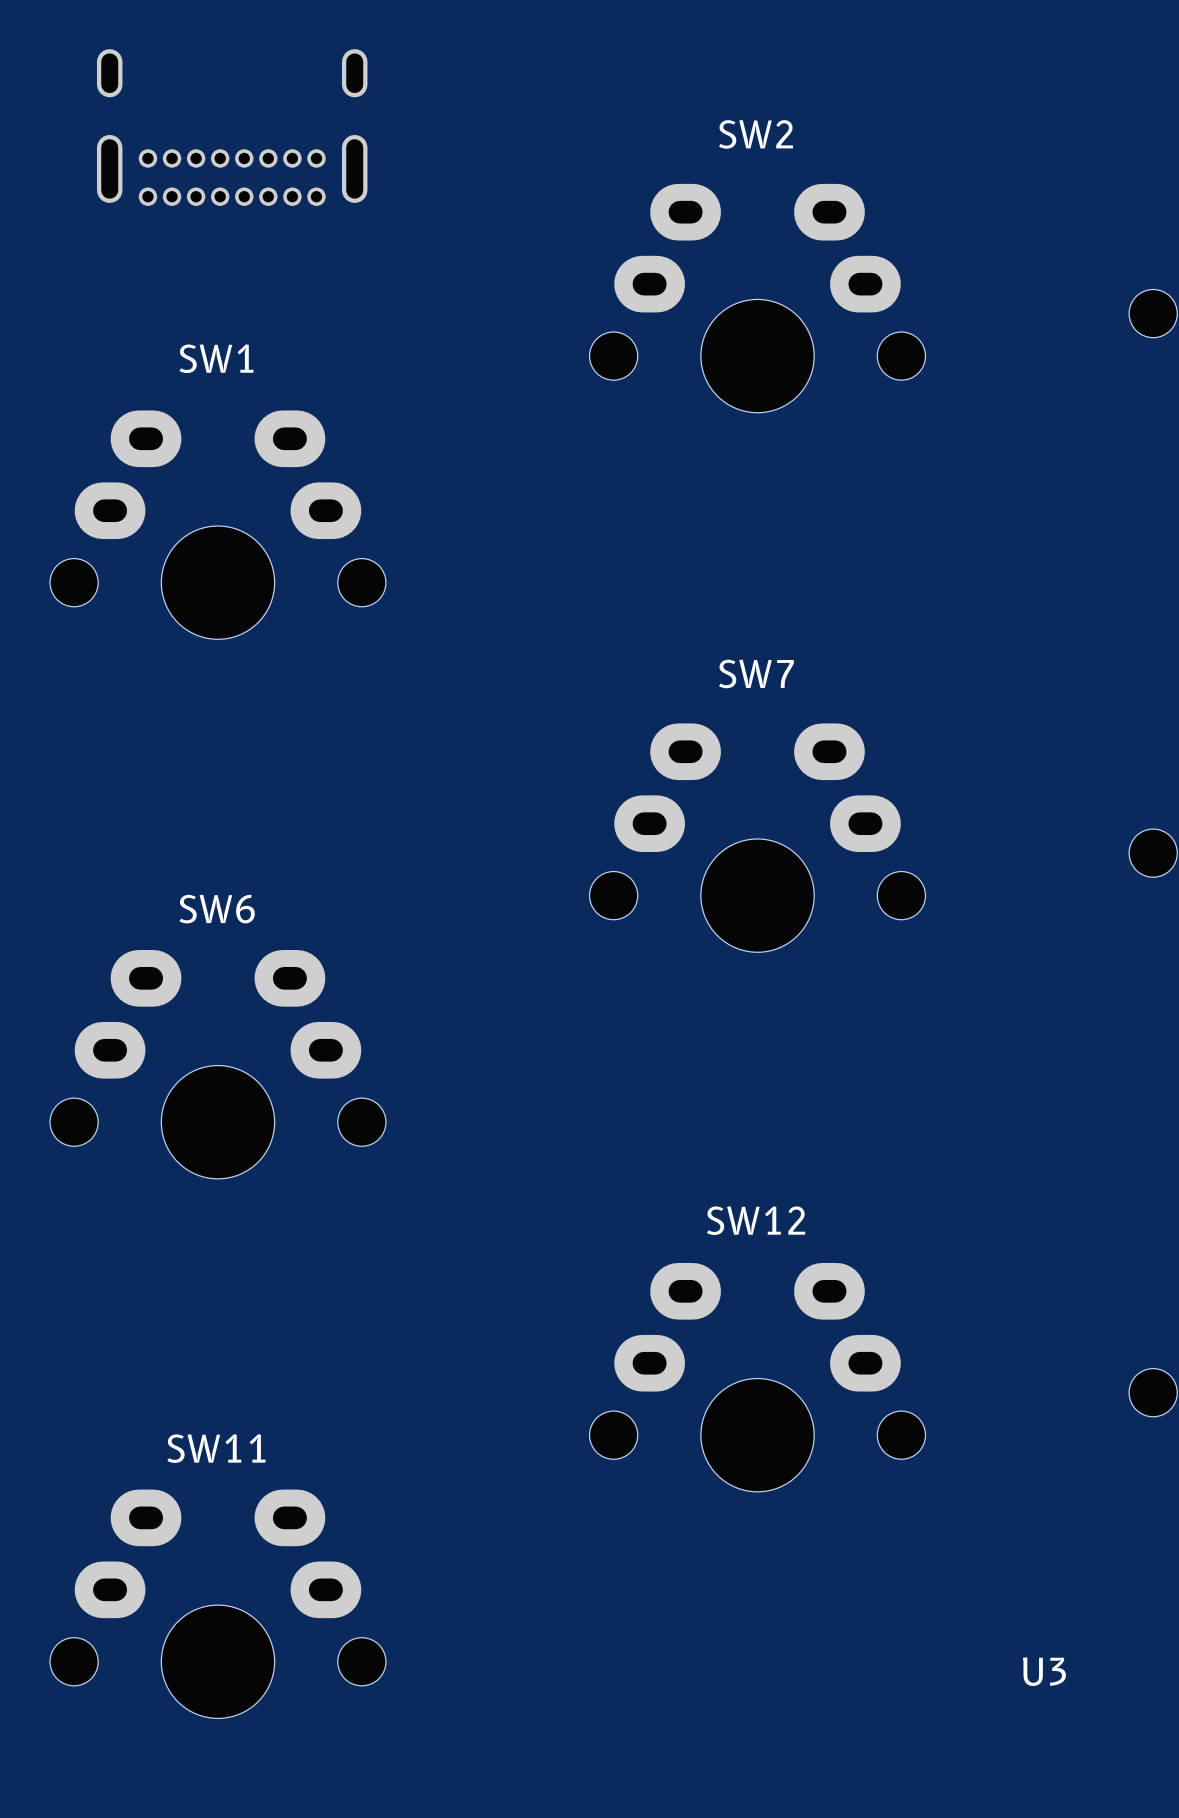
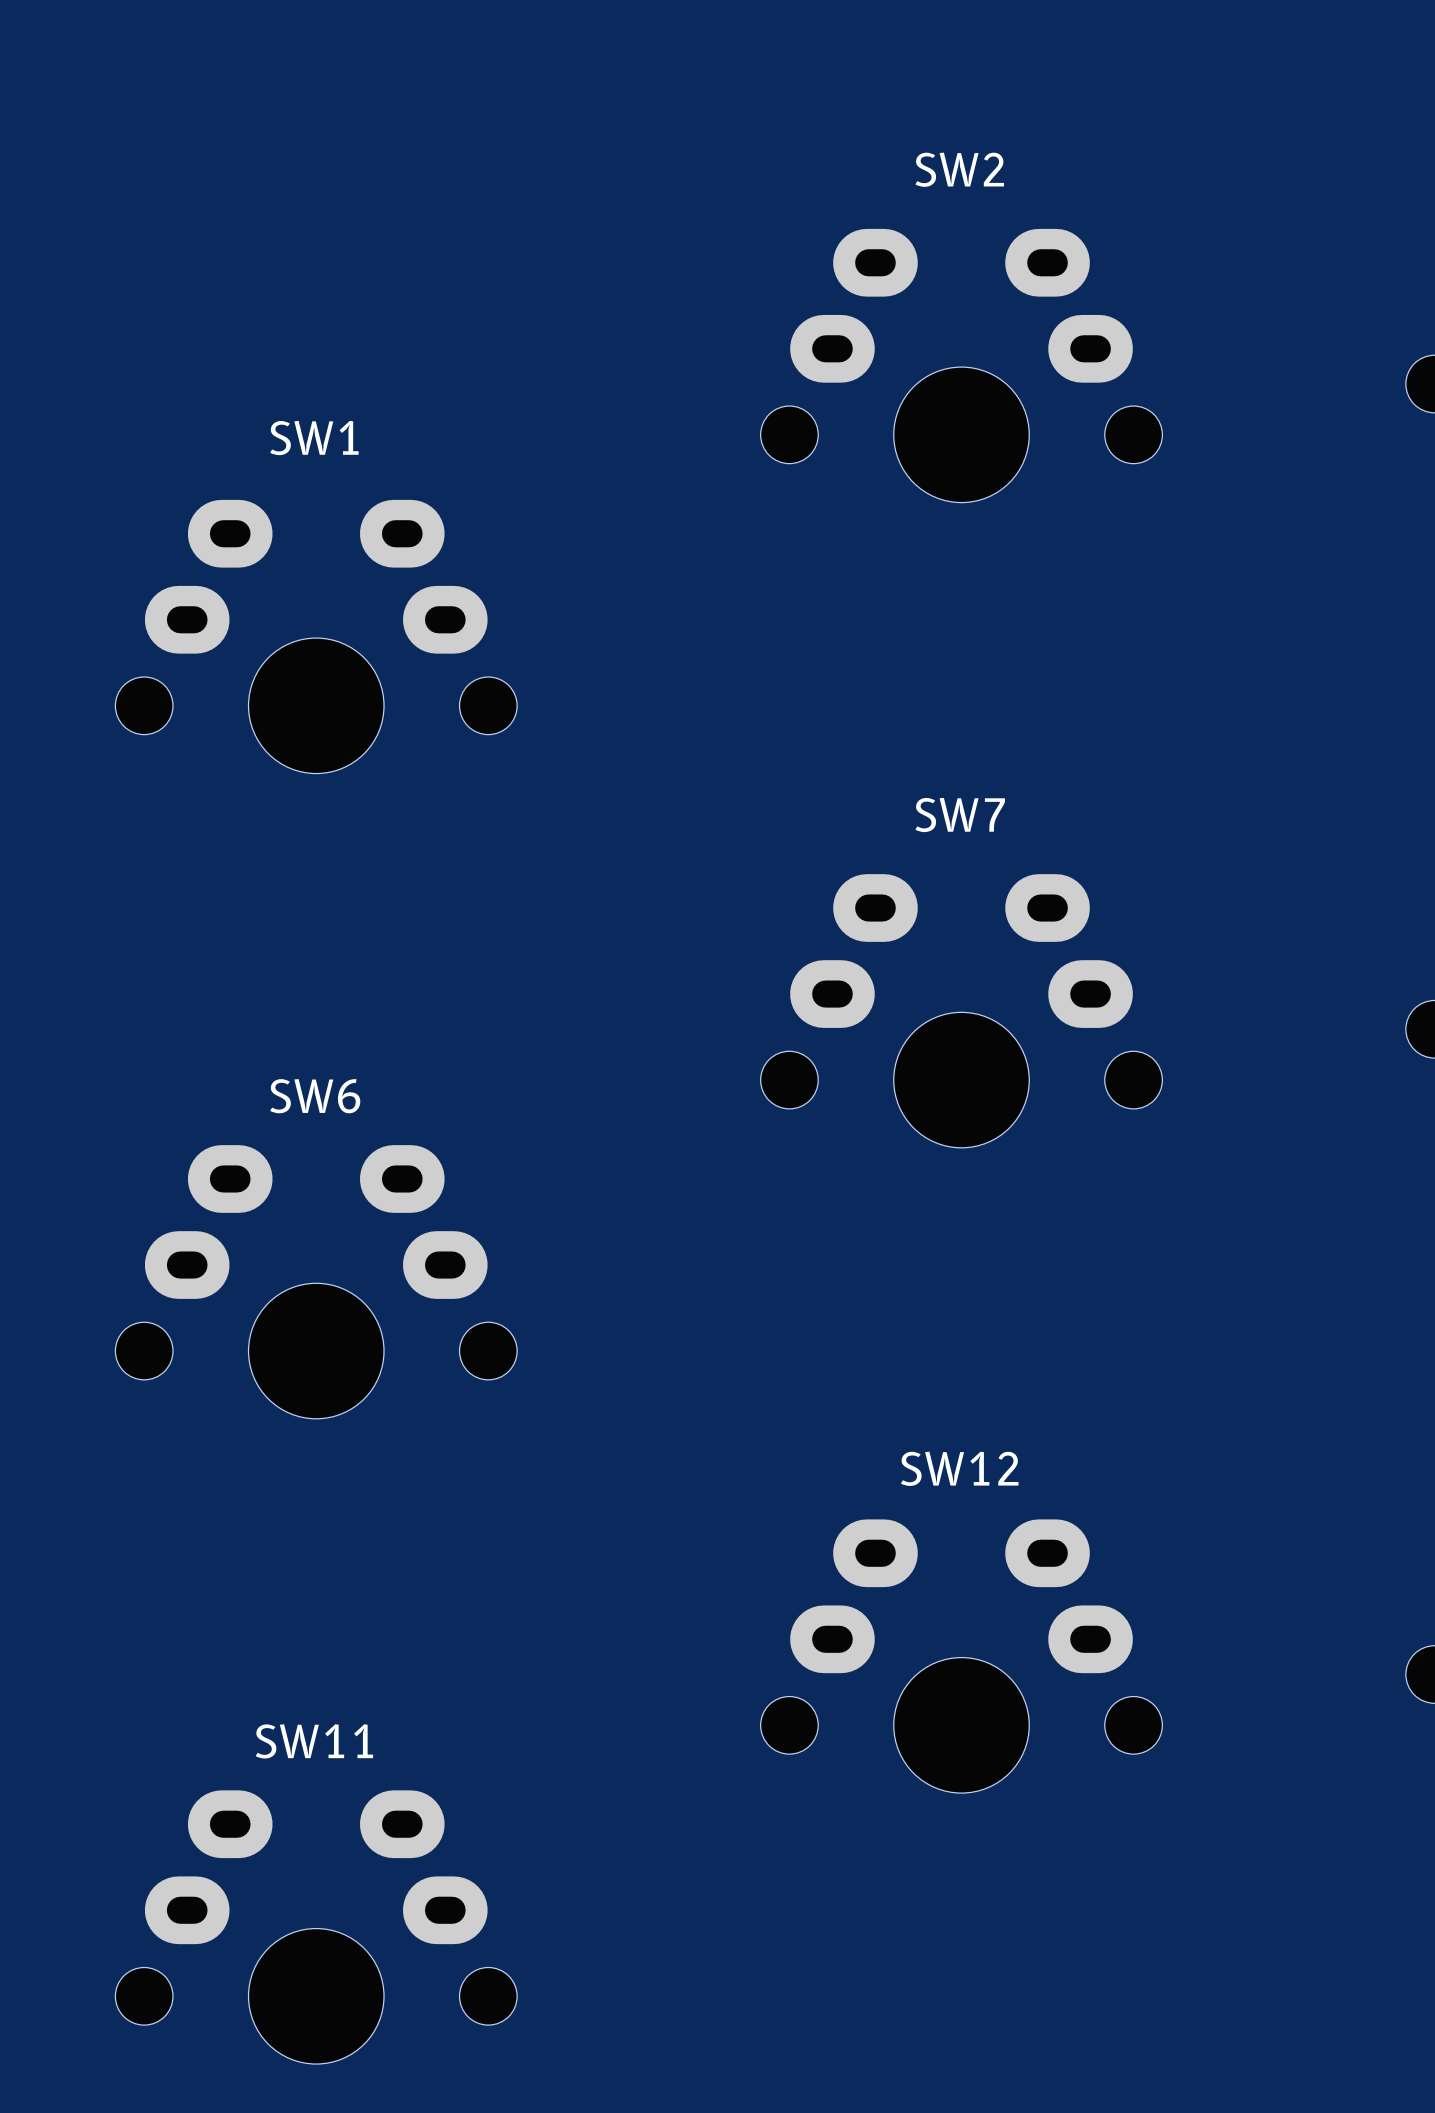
part: (232, 127) -> none
U3: (1044, 1671) -> none

